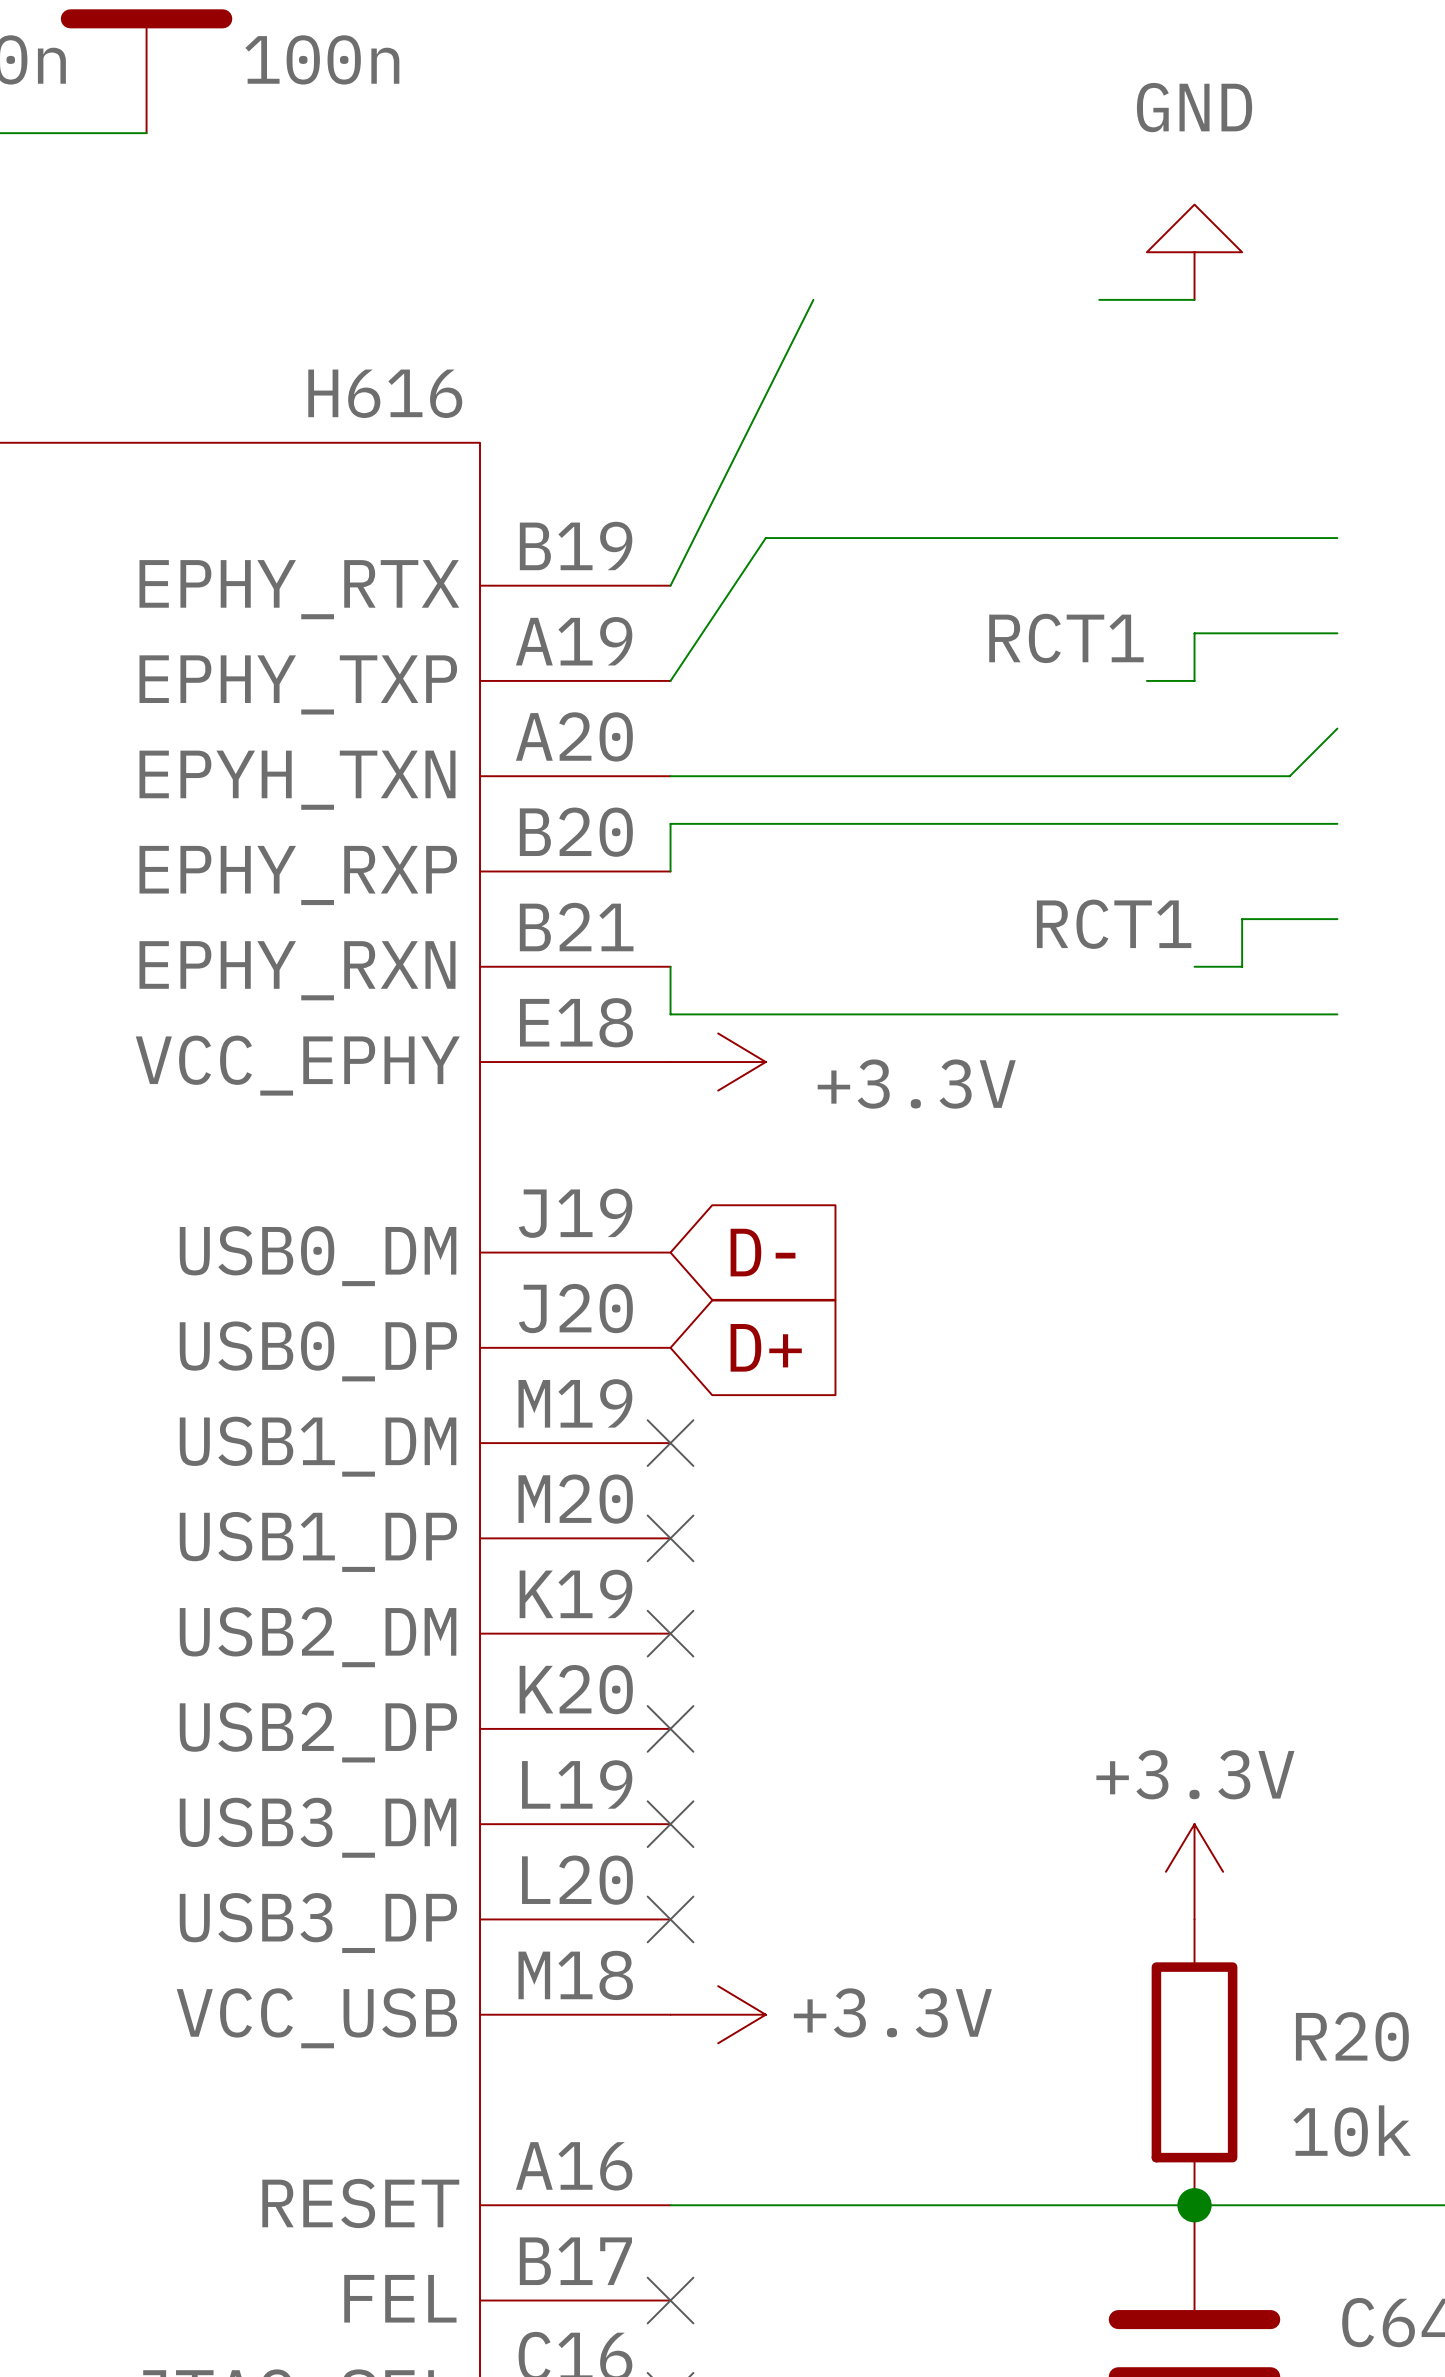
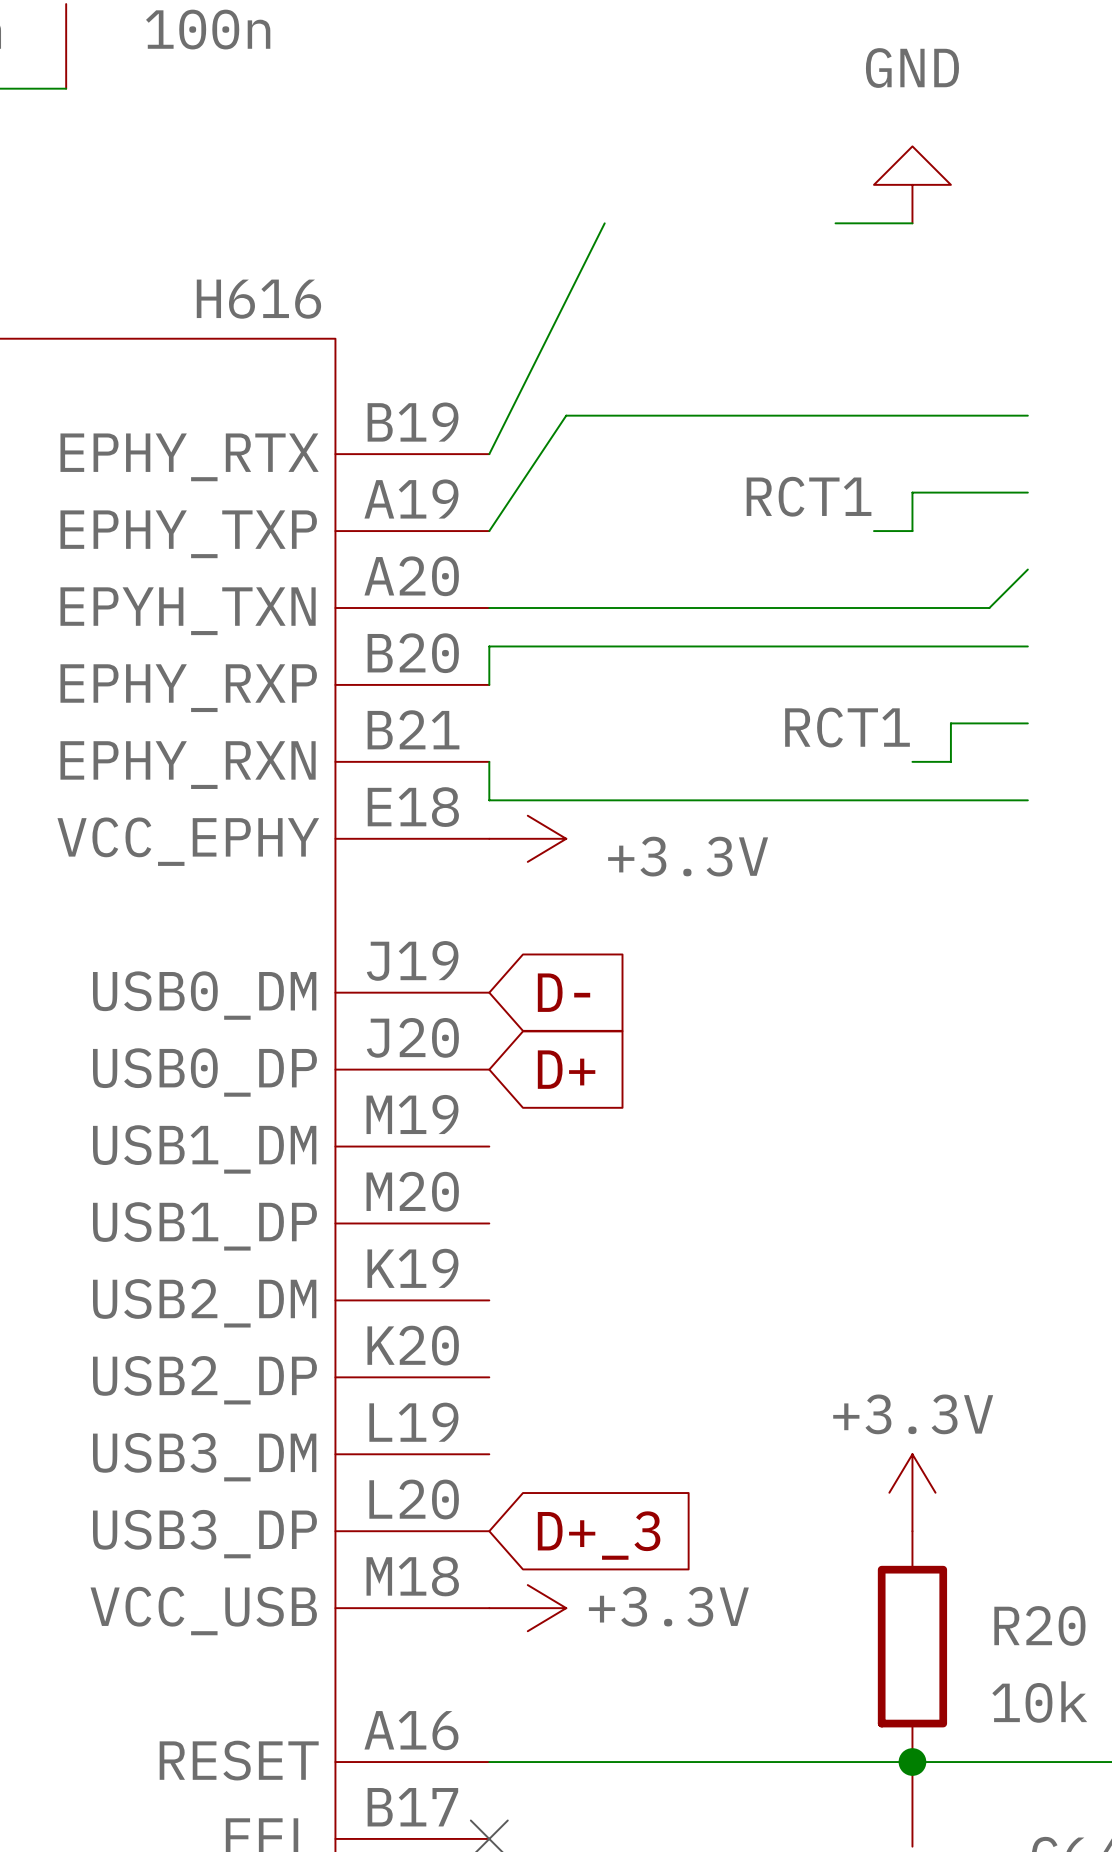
no-connect mark: (670, 1443) -> none
no-connect mark: (670, 1538) -> none
no-connect mark: (670, 1633) -> none
no-connect mark: (670, 1728) -> none
no-connect mark: (670, 1824) -> none
no-connect mark: (670, 1919) -> none
global label: none -> D+_3 (599, 1535)

